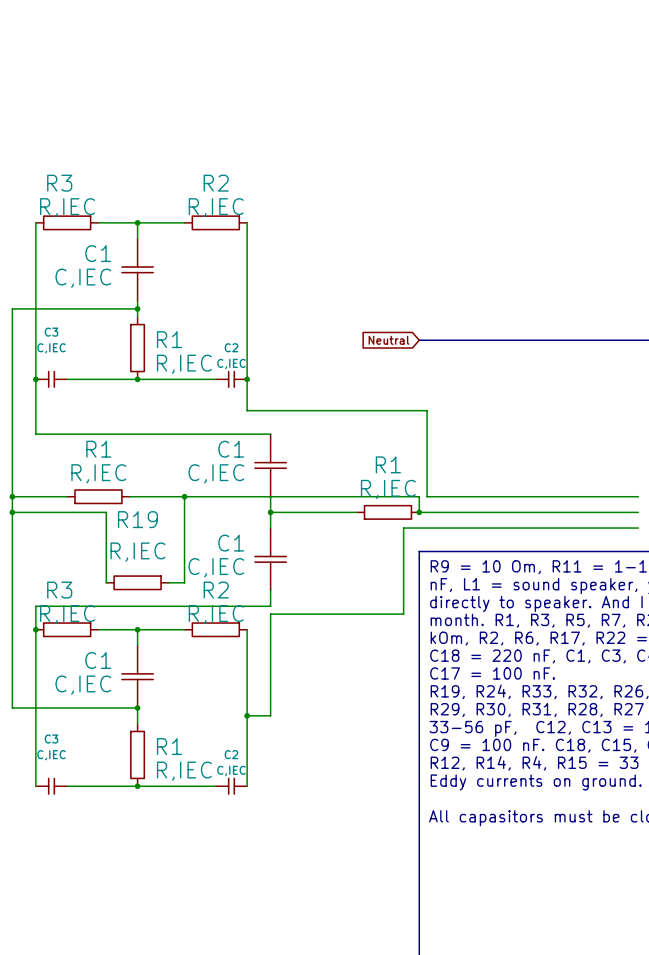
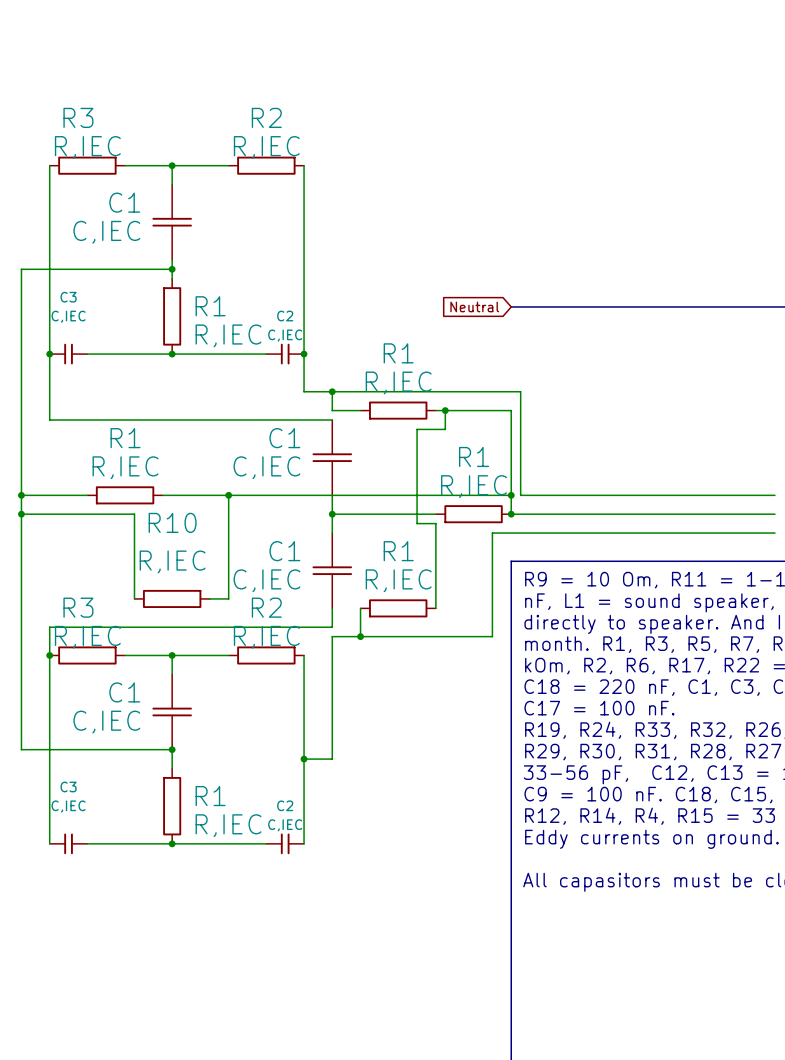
wire: none -> (332, 391) (332, 410) (360, 410)
junction: none -> (332, 391)
R1: none -> R,IEC (398, 410)
wire: none -> (435, 410) (511, 410) (511, 495)
wire: none -> (445, 410) (445, 429) (417, 429) (417, 523) (435, 523) (435, 608)
junction: none -> (445, 410)
junction: none -> (511, 495)
R19 name: R19 (137, 519) -> R10 (172, 522)
wire: none -> (360, 608) (360, 636)
R1: none -> R,IEC (398, 608)
junction: none -> (360, 636)

